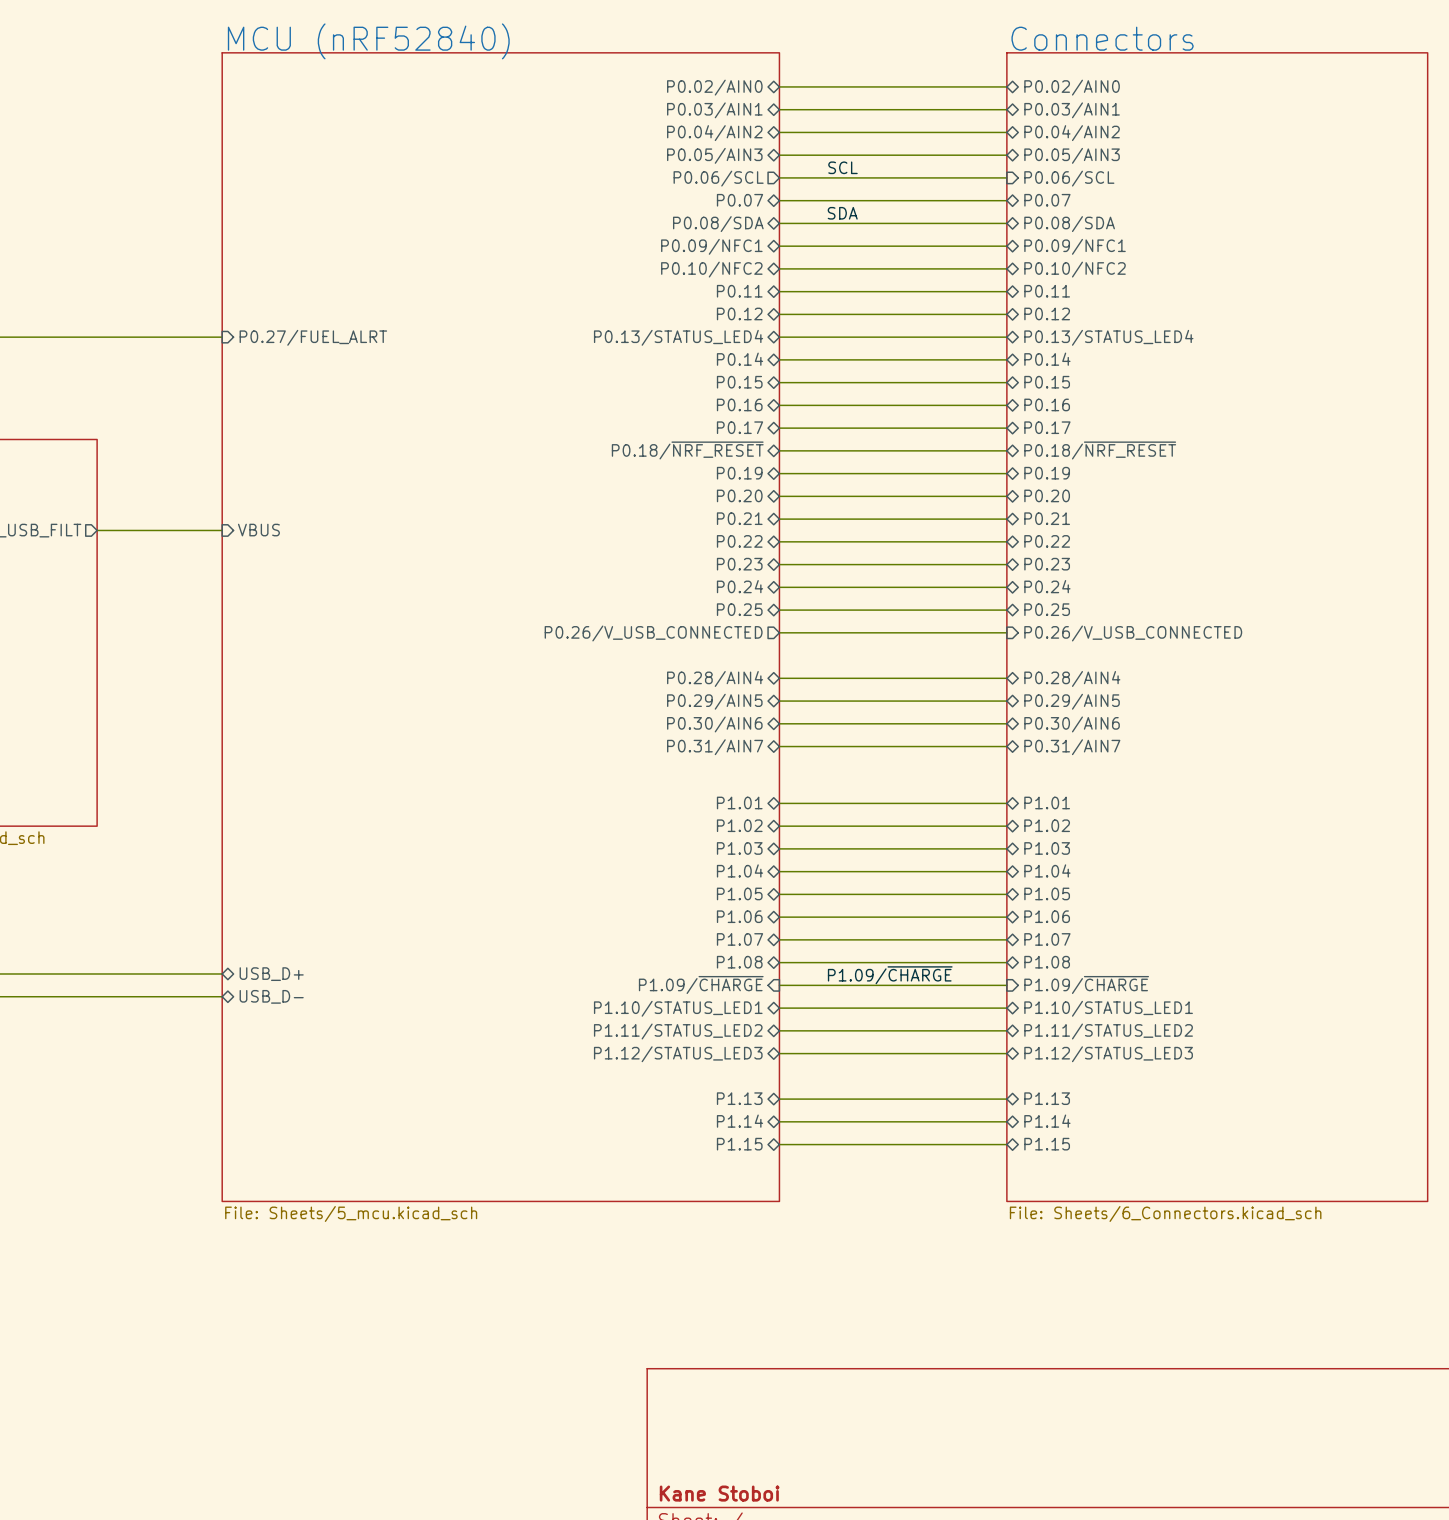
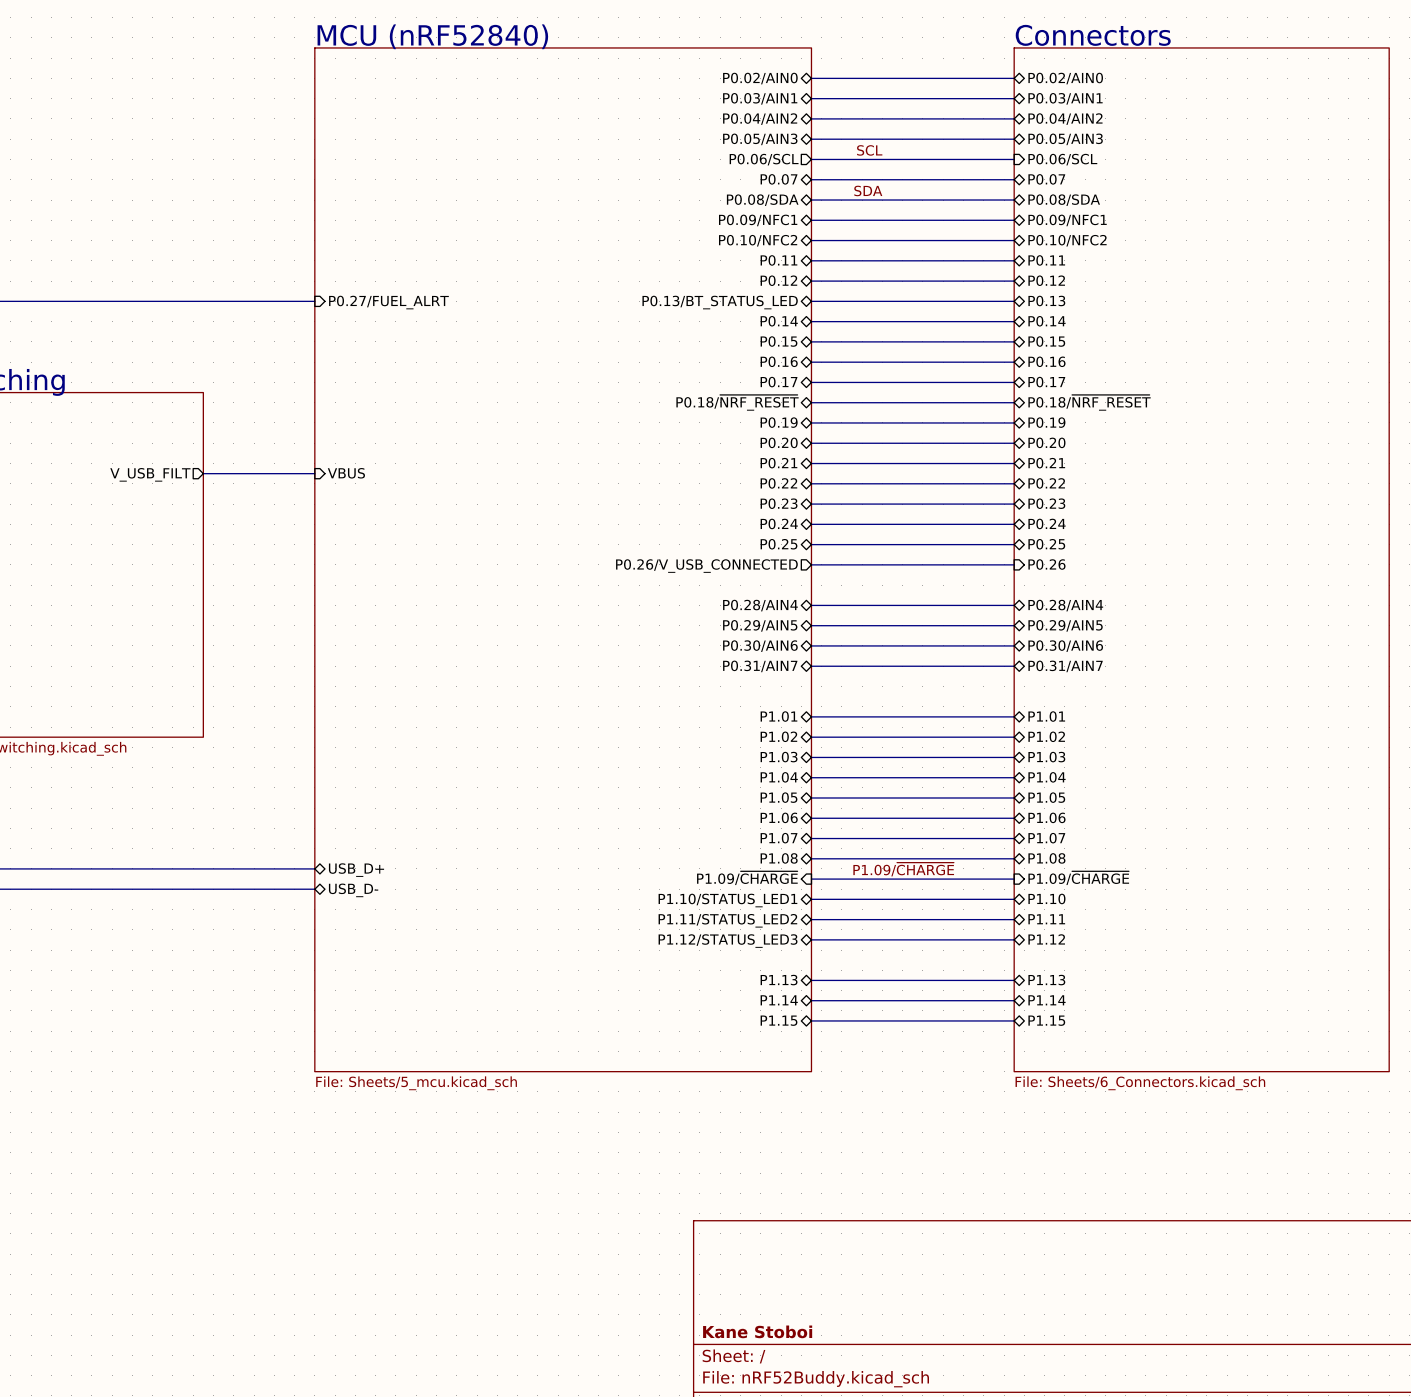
sheet pin: P0.13/STATUS_LED4 (678, 337) -> P0.13/BT_STATUS_LED (720, 302)
sheet pin: P0.13/STATUS_LED4 (1108, 337) -> P0.13 (1046, 300)
sheet pin: P0.26/V_USB_CONNECTED (1133, 633) -> P0.26 (1046, 564)
sheet pin: P1.10/STATUS_LED1 (1108, 1008) -> P1.10 (1046, 898)
sheet pin: P1.11/STATUS_LED2 (1108, 1031) -> P1.11 (1046, 919)
sheet pin: P1.12/STATUS_LED3 (1108, 1054) -> P1.12 (1046, 939)

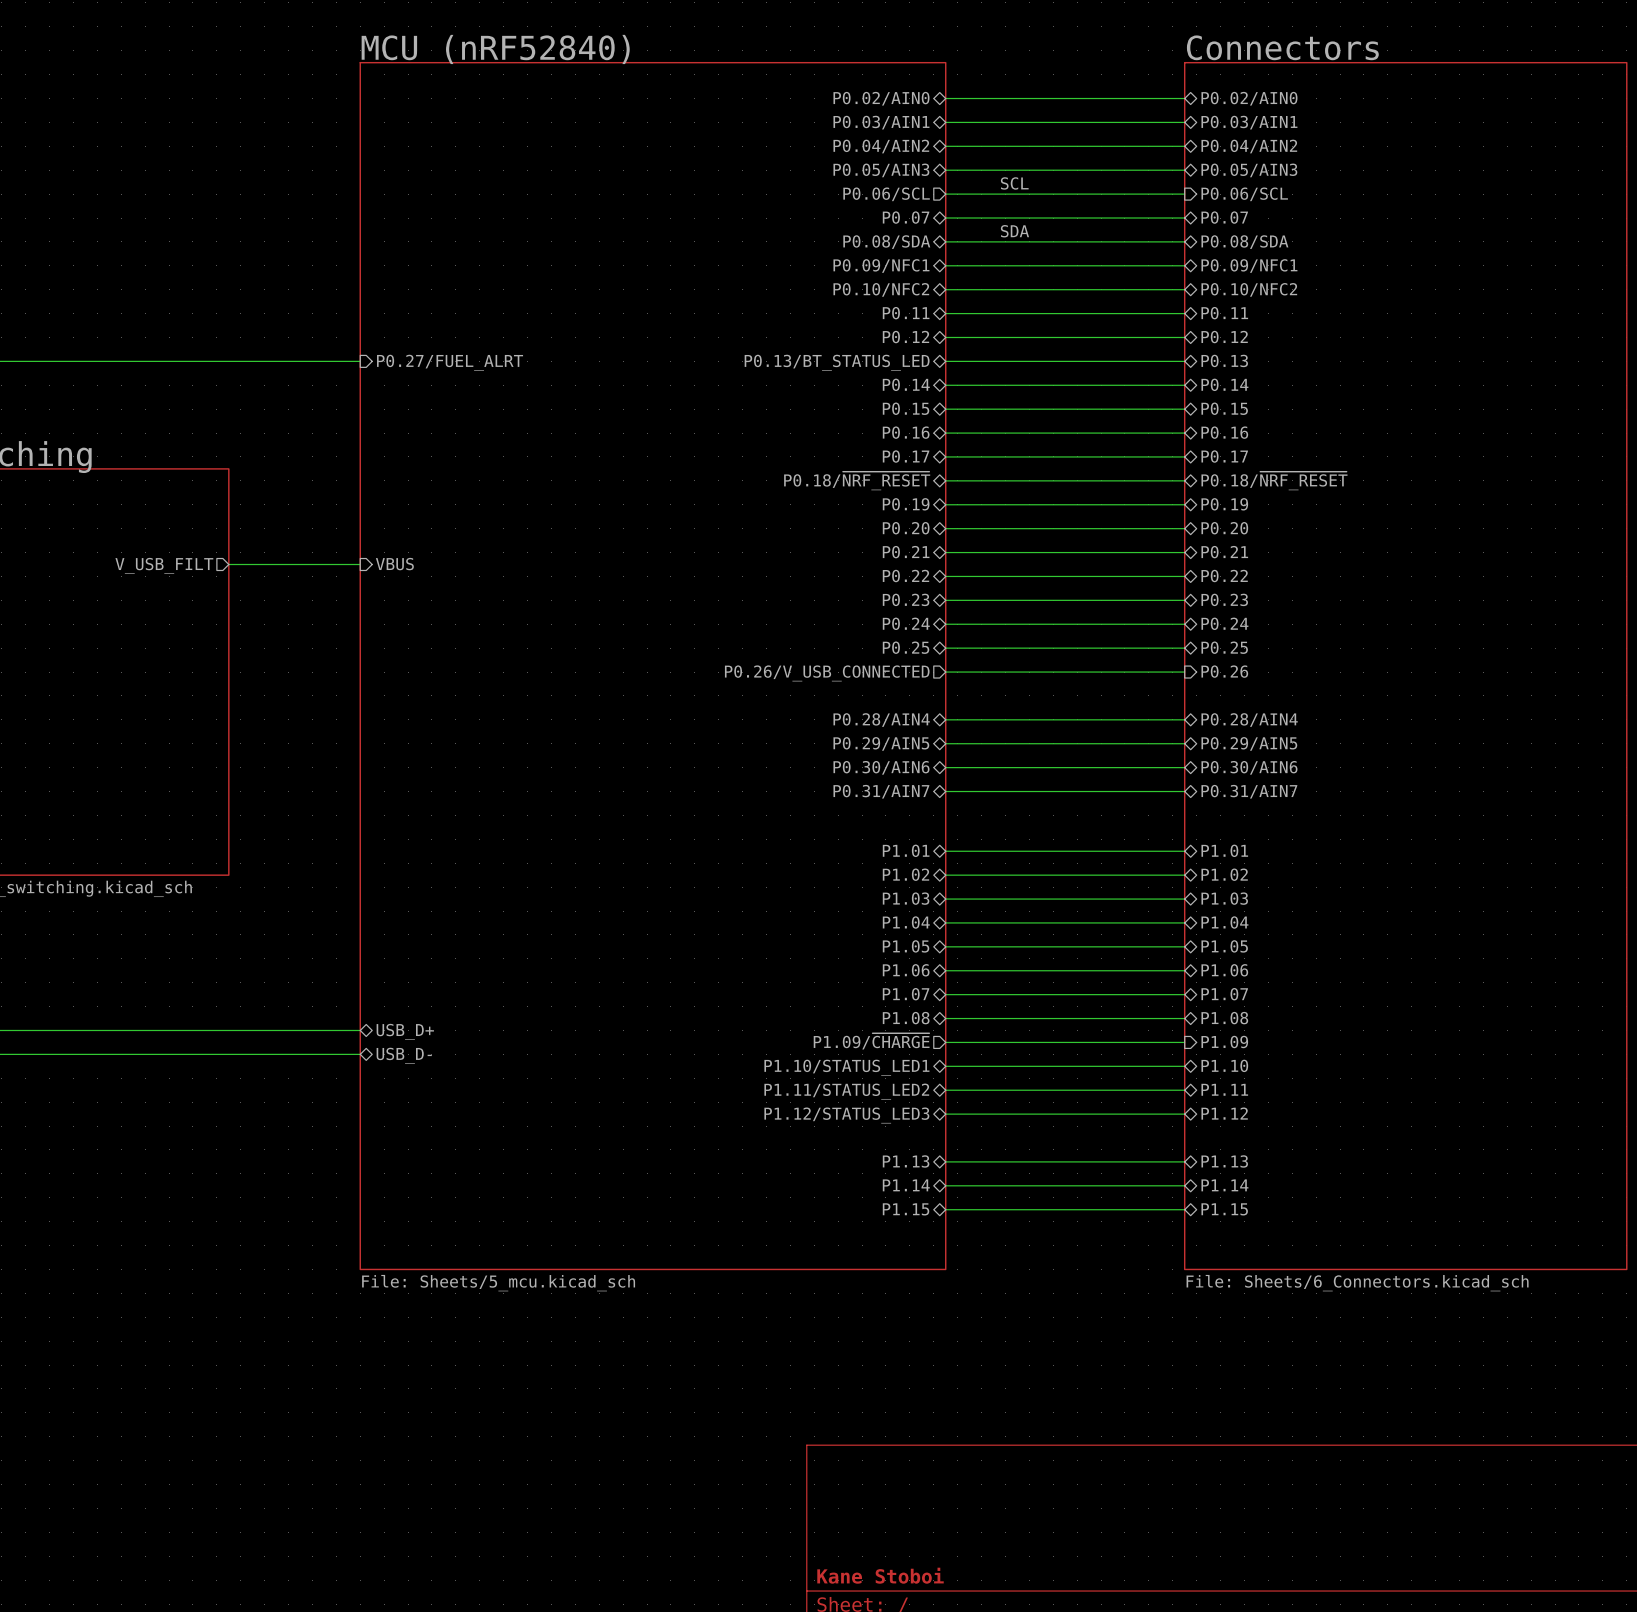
label: P1.09/~{CHARGE} (903, 869) -> none
sheet pin shape: input (747, 878) -> output (871, 1041)
sheet pin: P1.09/~{CHARGE} (1078, 878) -> P1.09 (1224, 1041)

